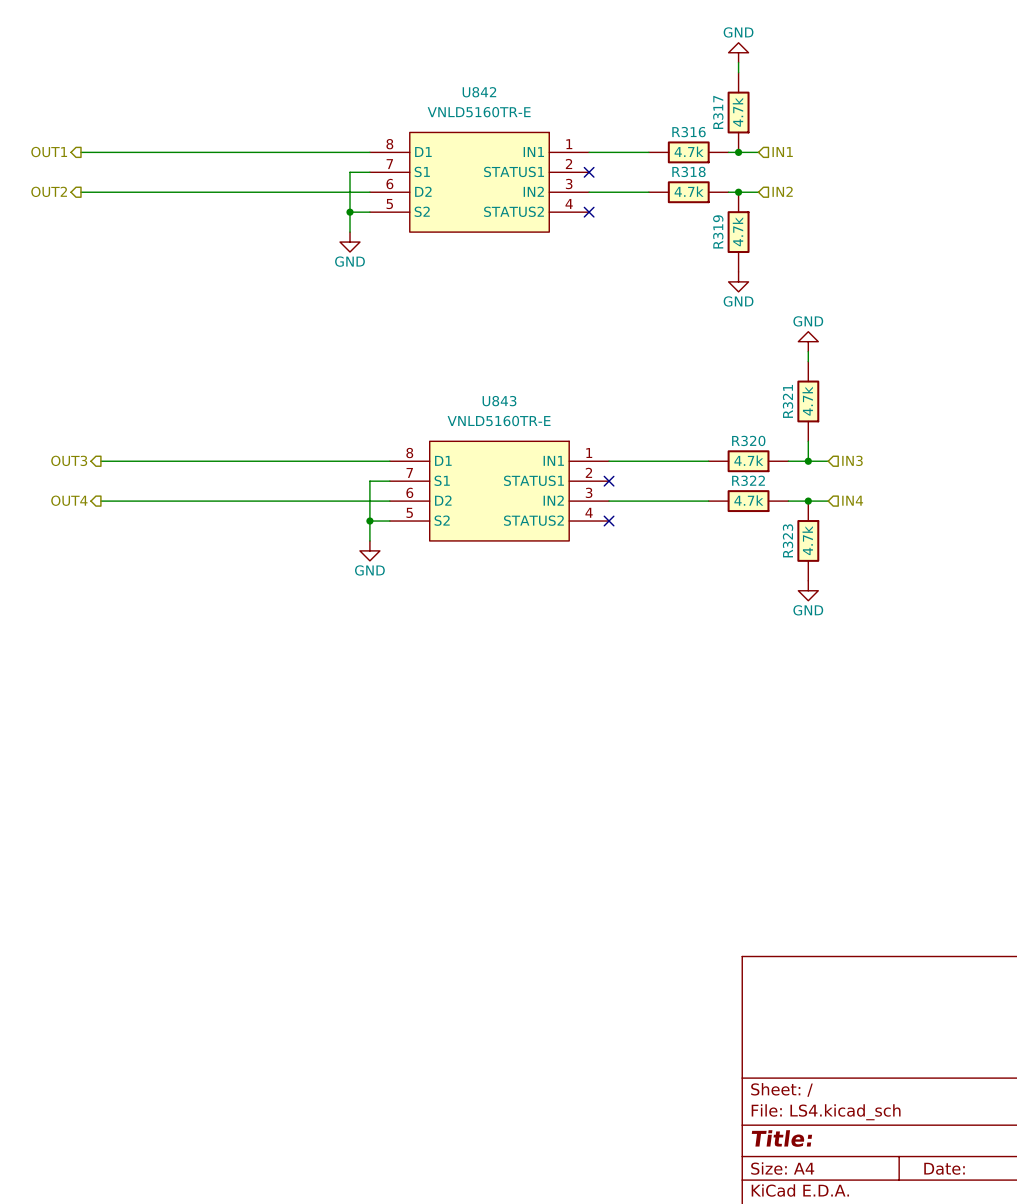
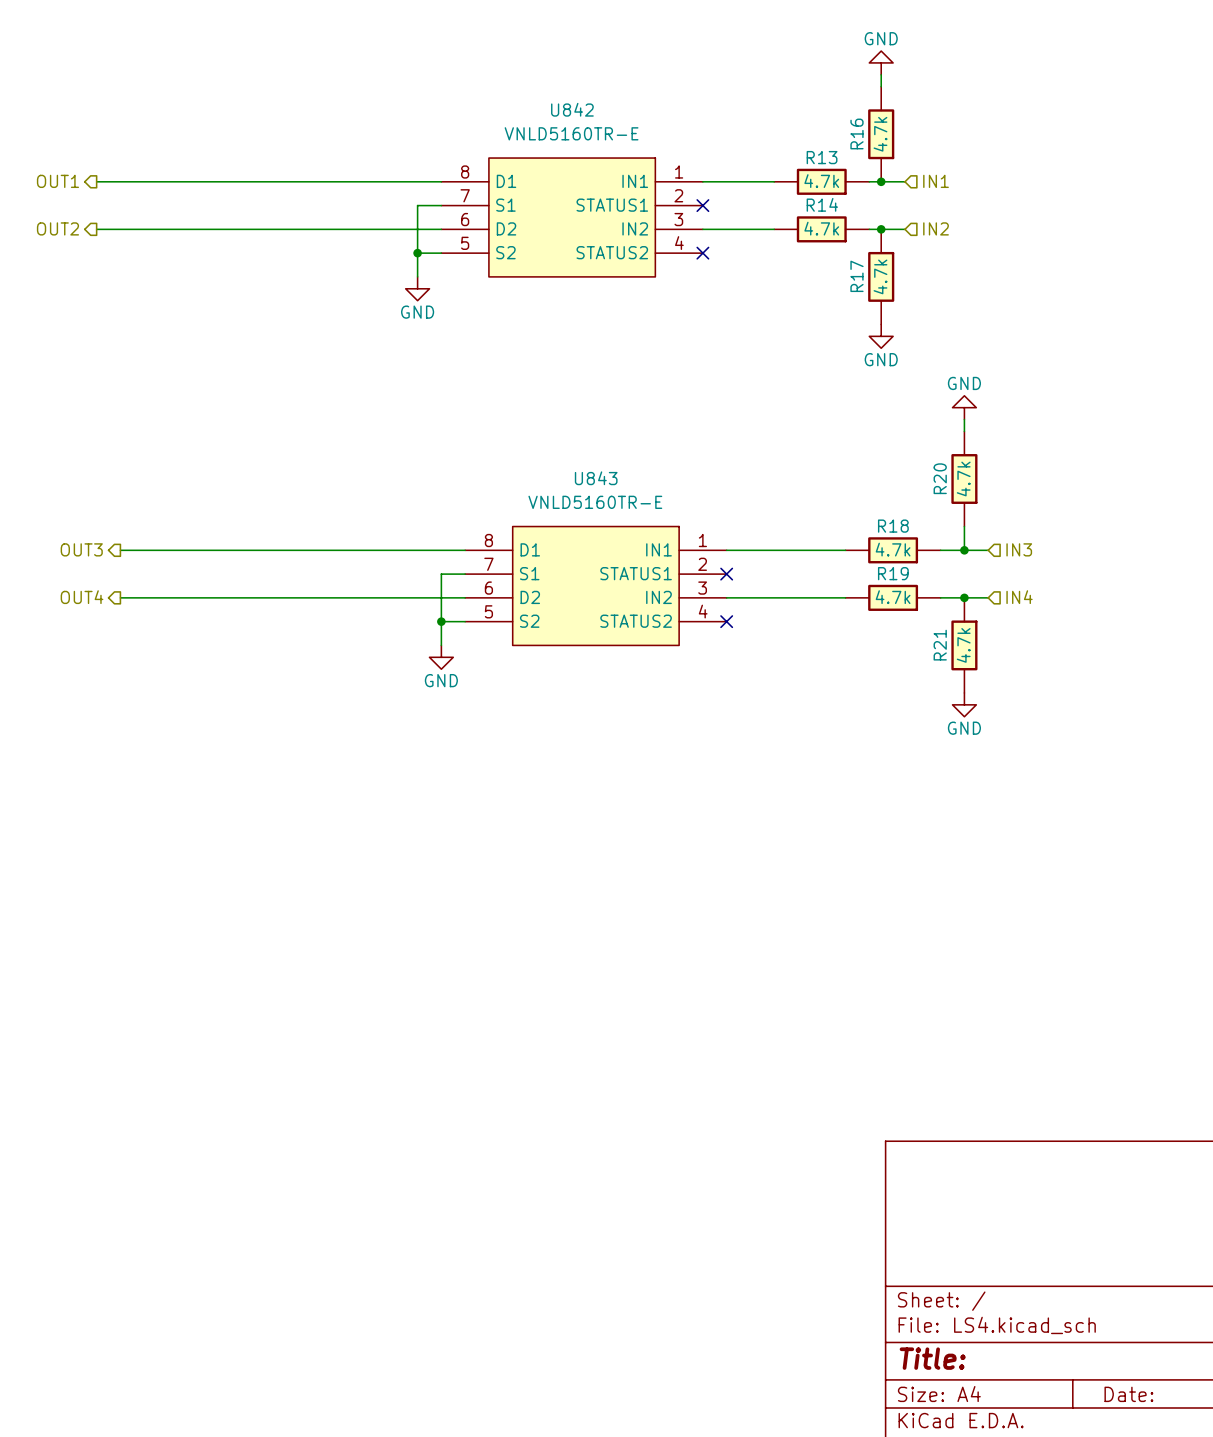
R317 name: R317 (718, 112) -> R16 (856, 133)
R316 name: R316 (688, 132) -> R13 (822, 157)
R318 name: R318 (688, 171) -> R14 (822, 204)
R319 name: R319 (718, 231) -> R17 (856, 276)
R321 name: R321 (788, 401) -> R20 (940, 478)
R320 name: R320 (748, 440) -> R18 (893, 526)
R322 name: R322 (748, 480) -> R19 (893, 573)
R323 name: R323 (788, 540) -> R21 (940, 645)

